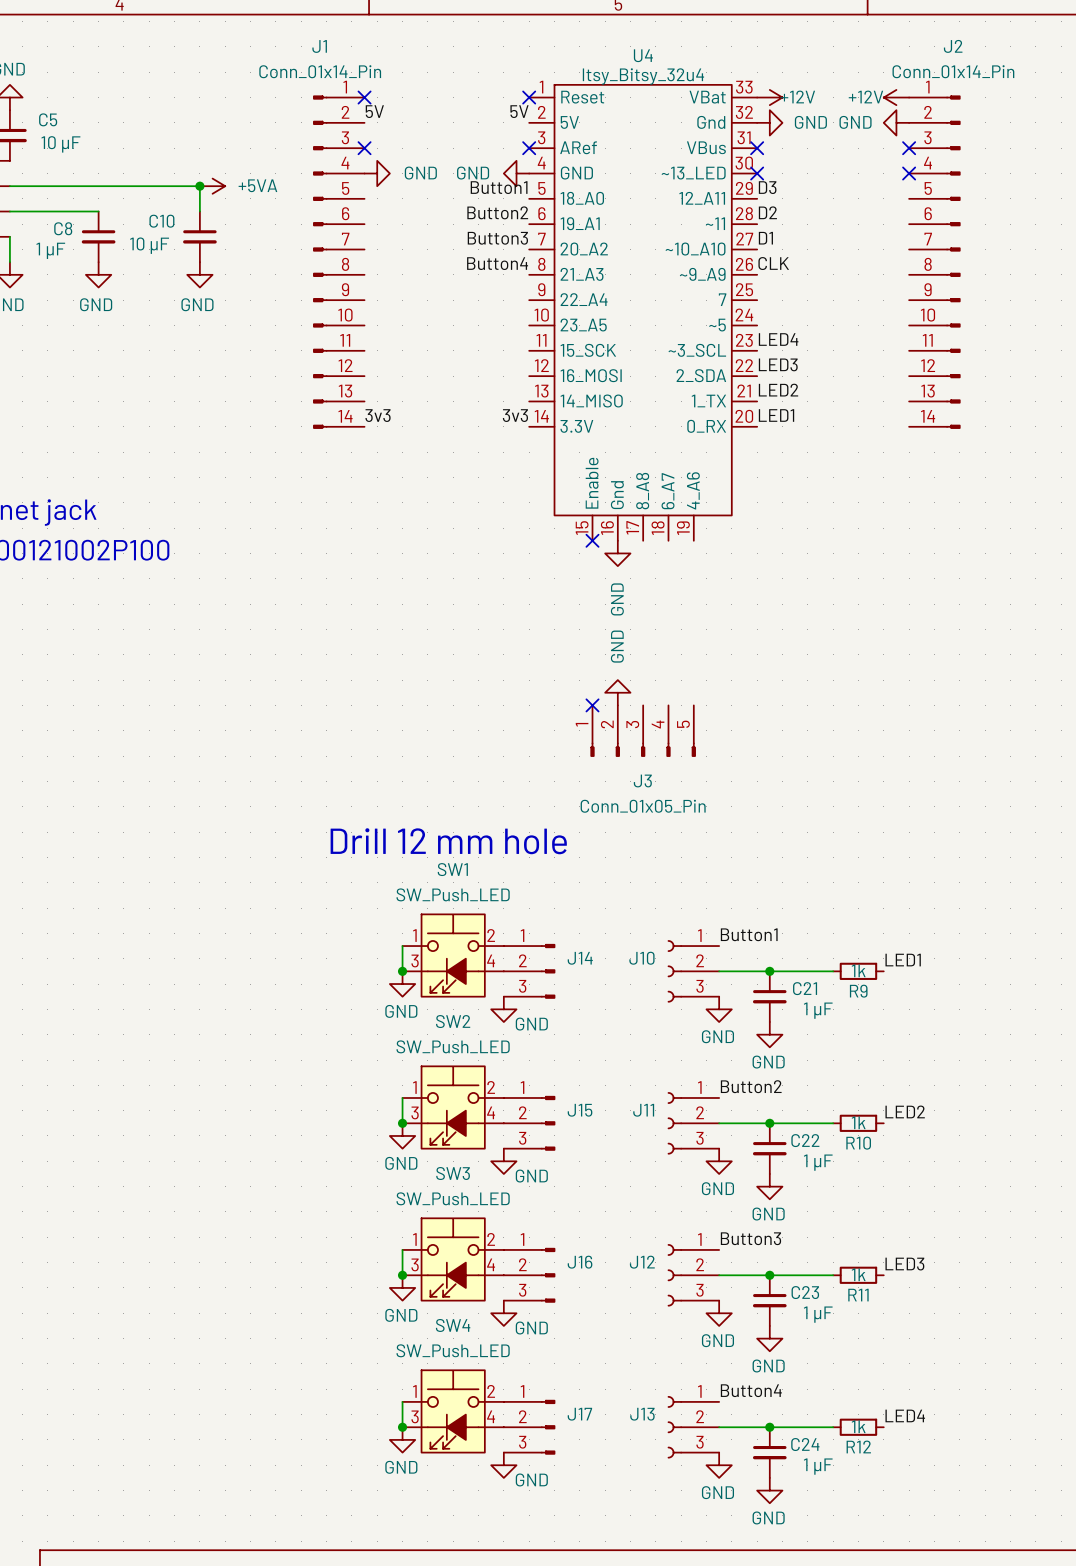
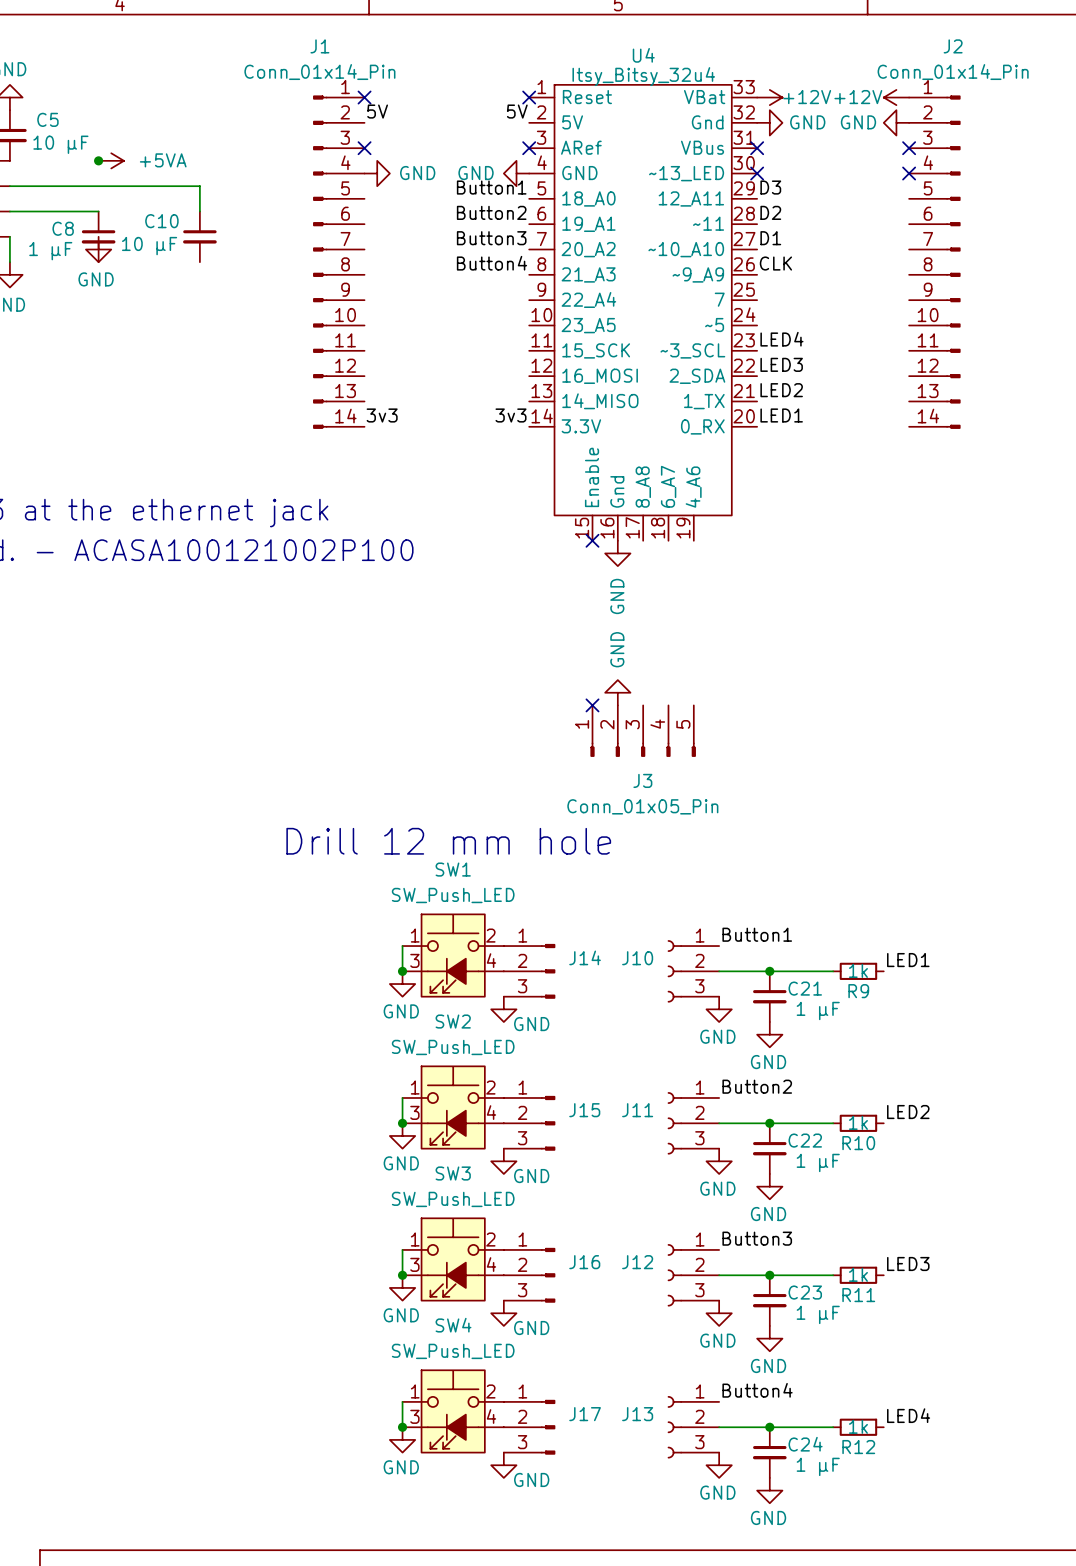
junction: none -> (98, 160)
junction: (199, 186) -> none
power symbol position: +5VA (212, 186) -> +5VA (111, 160)
power symbol position: GND (98, 274) -> GND (98, 249)
power symbol: GND (199, 274) -> none

